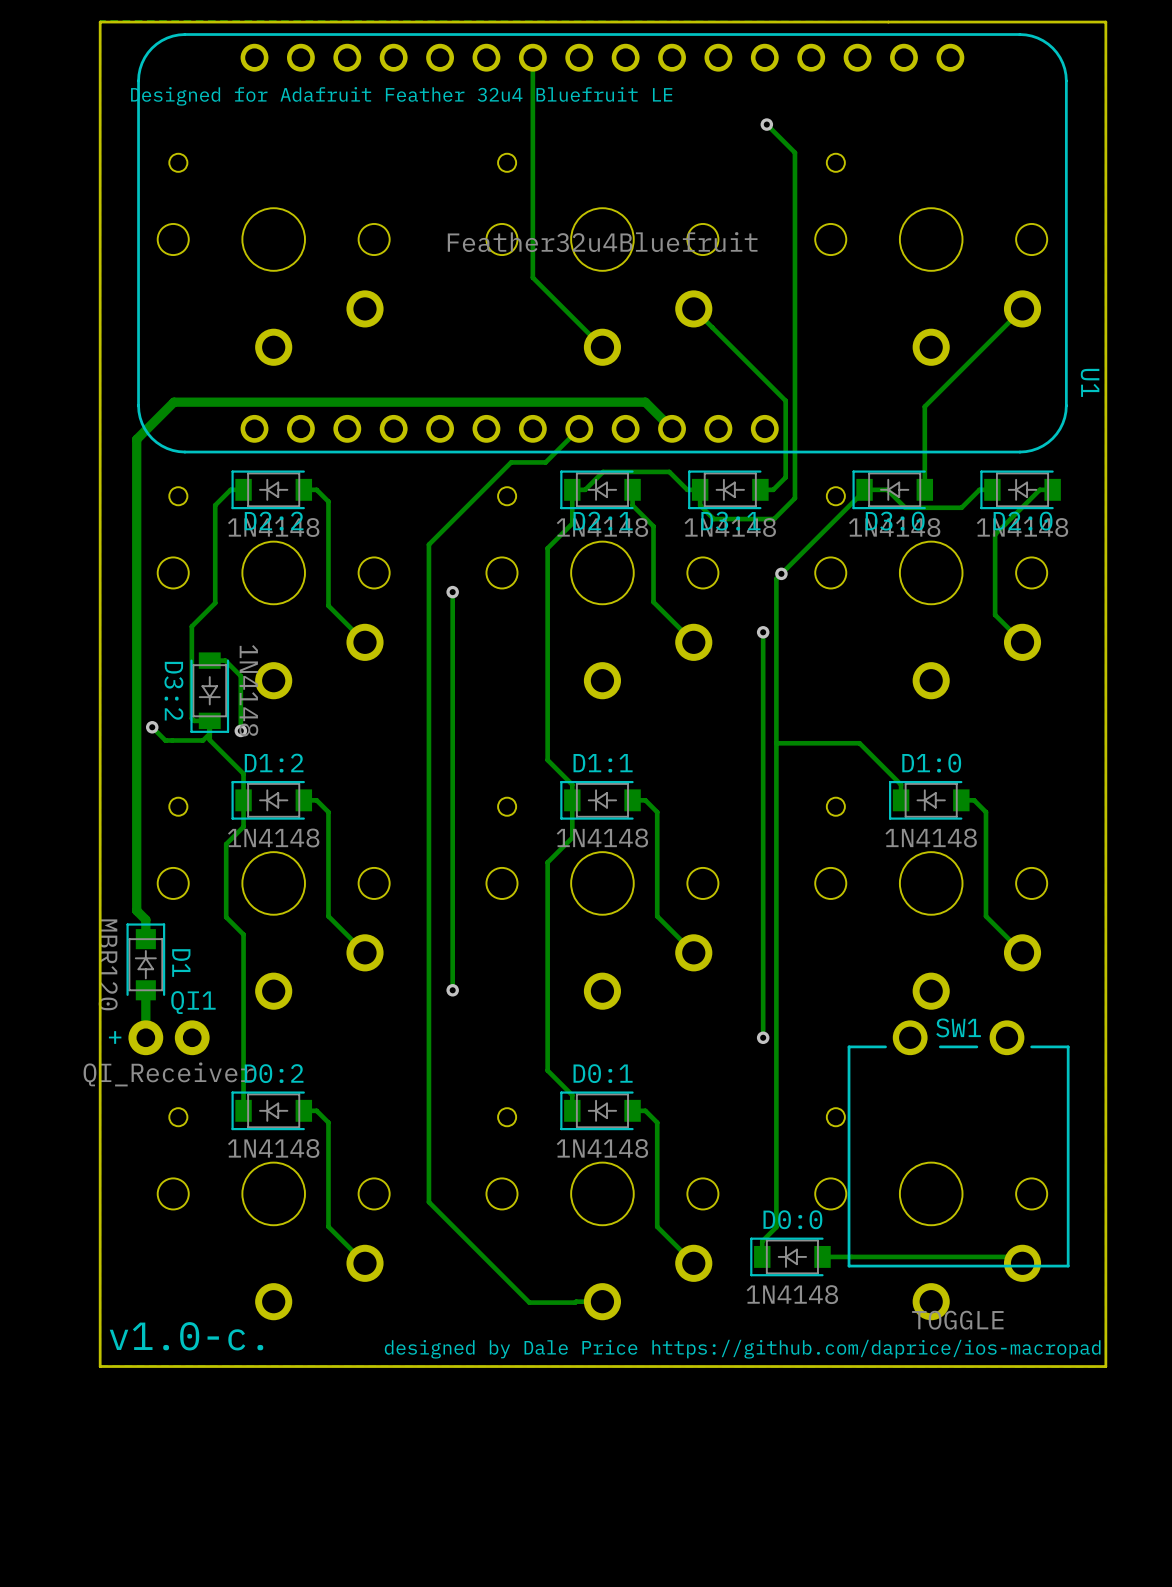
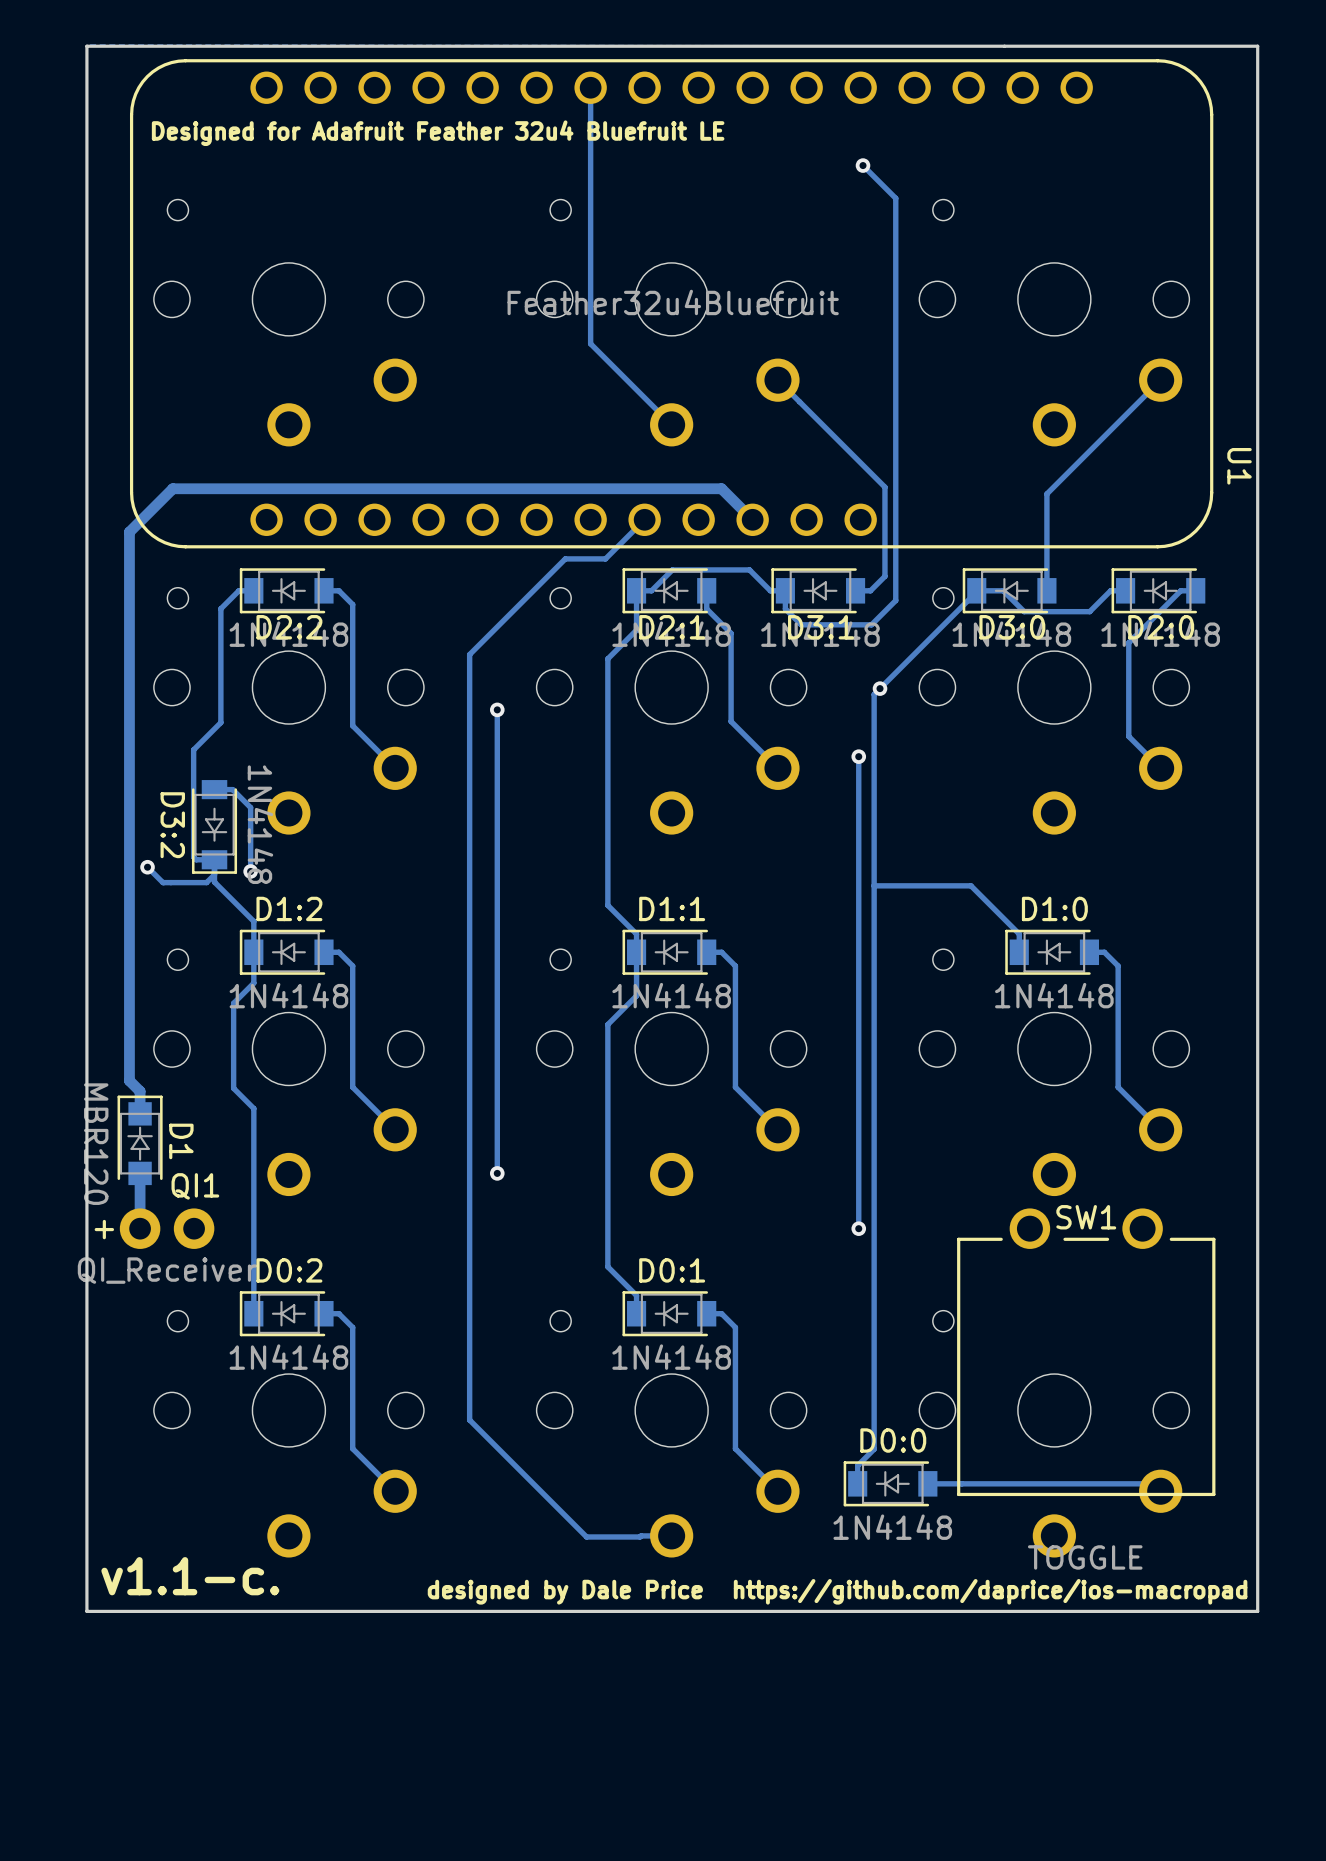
text: v1.0-c. (186, 1336) -> v1.1-c. (190, 1576)

